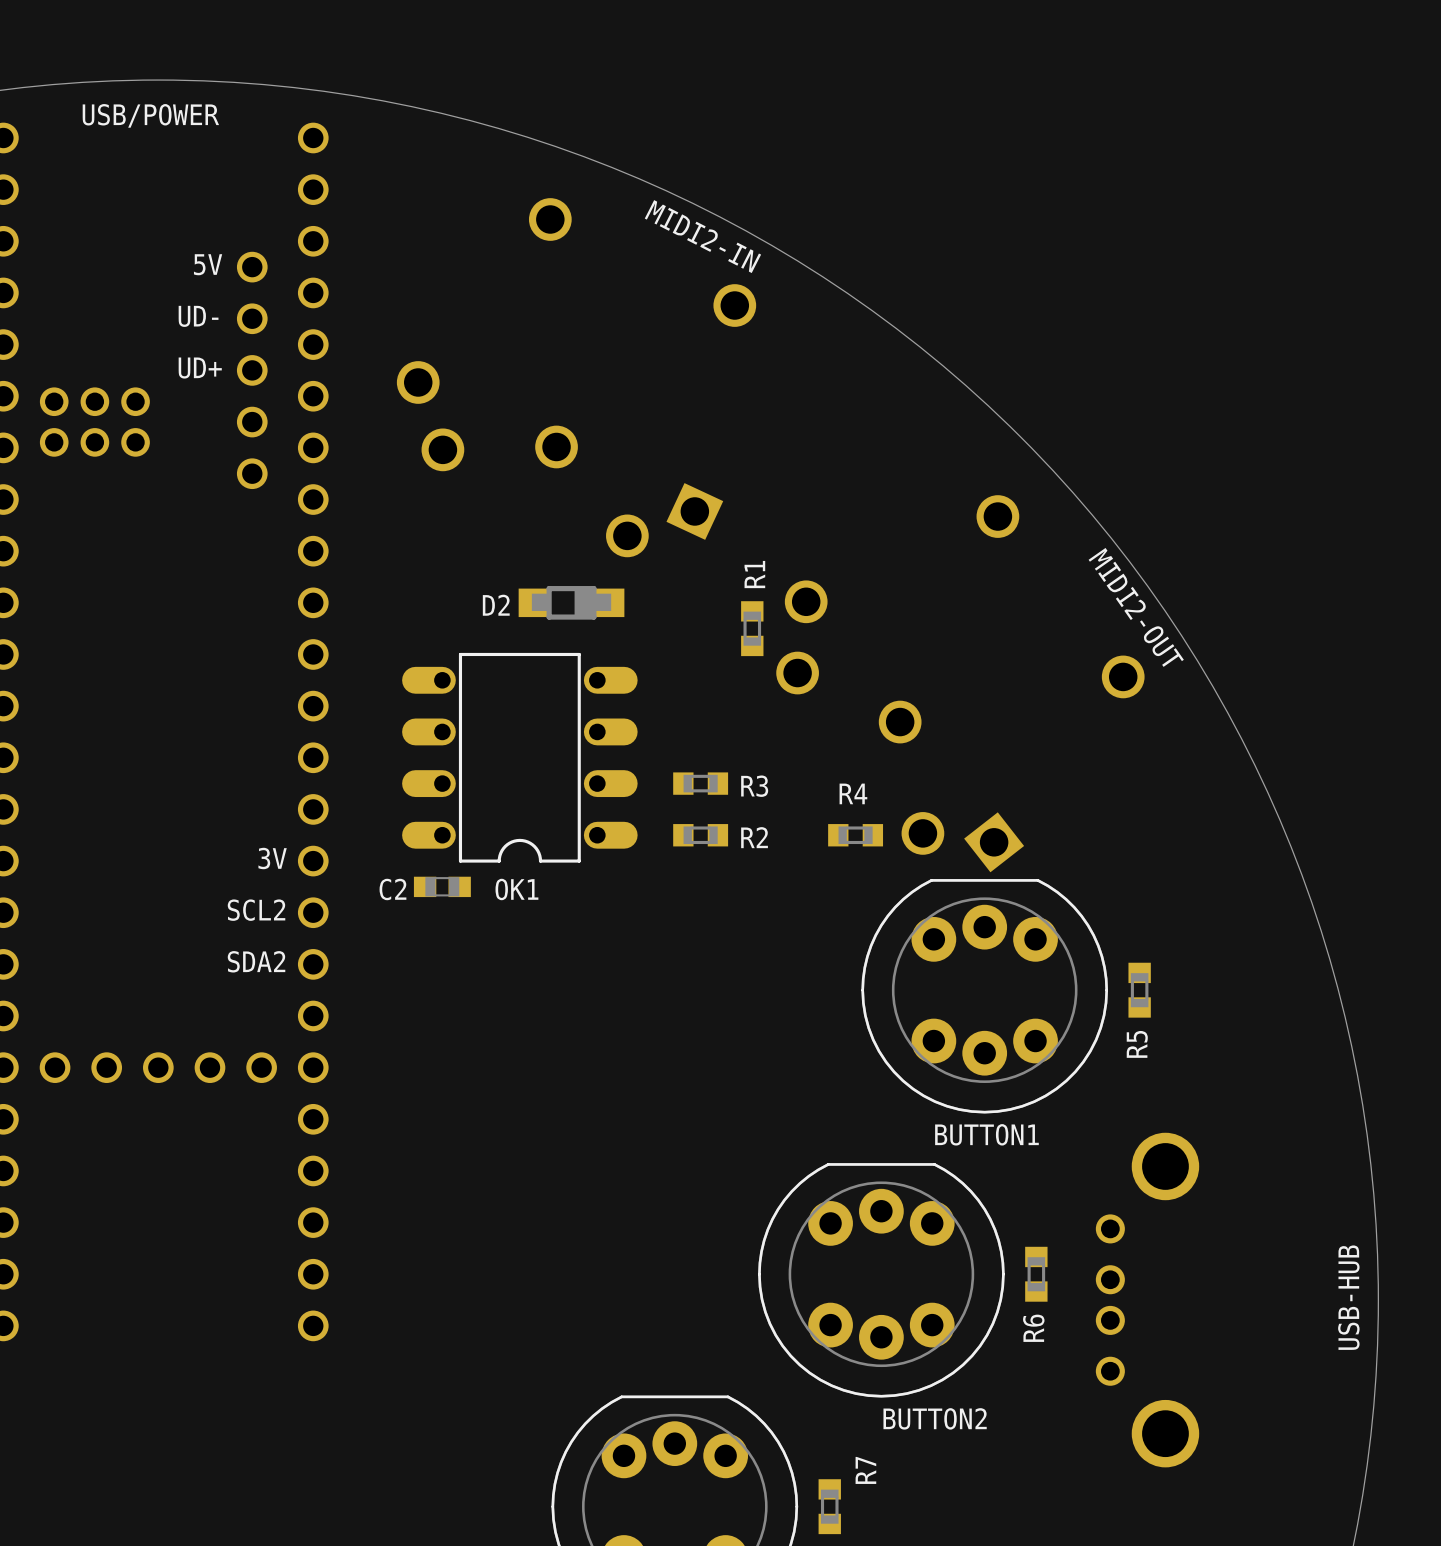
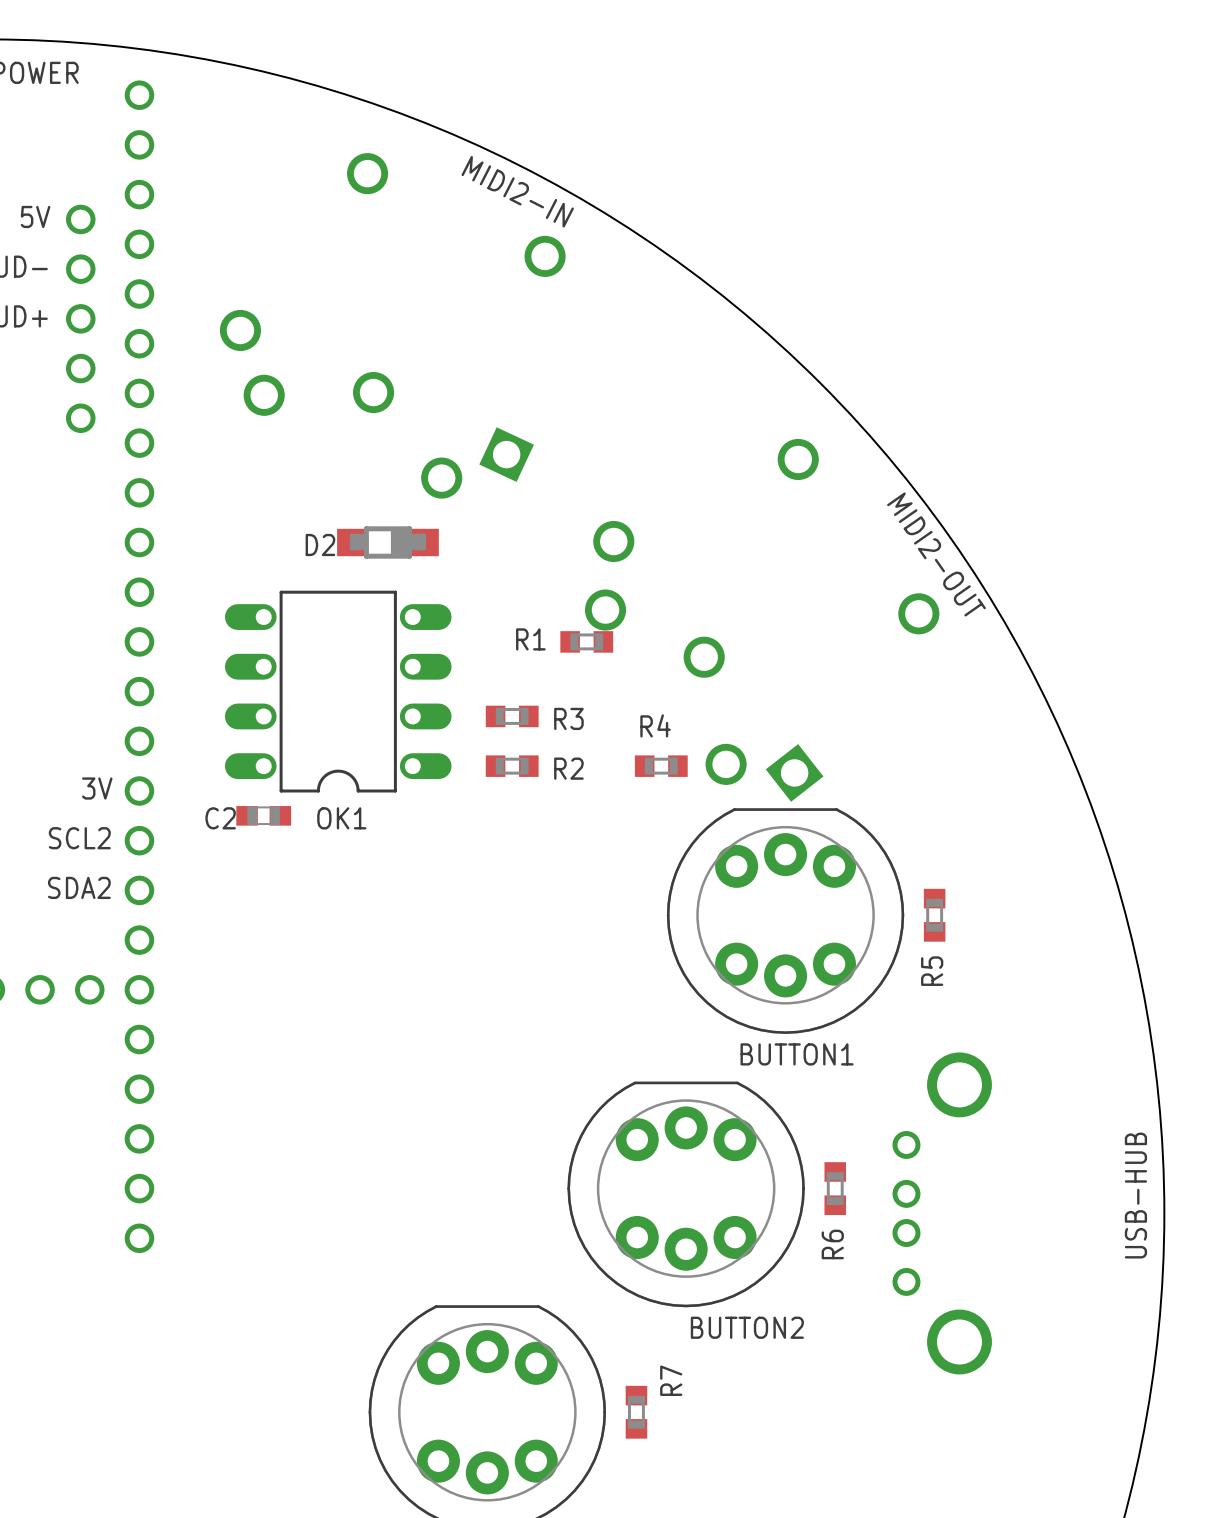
R1 name position: R1 (754, 574) -> R1 (530, 639)
R1 rotation: 0° (752, 628) -> 90° clockwise (586, 641)
R1 position: (752, 628) -> (586, 641)

